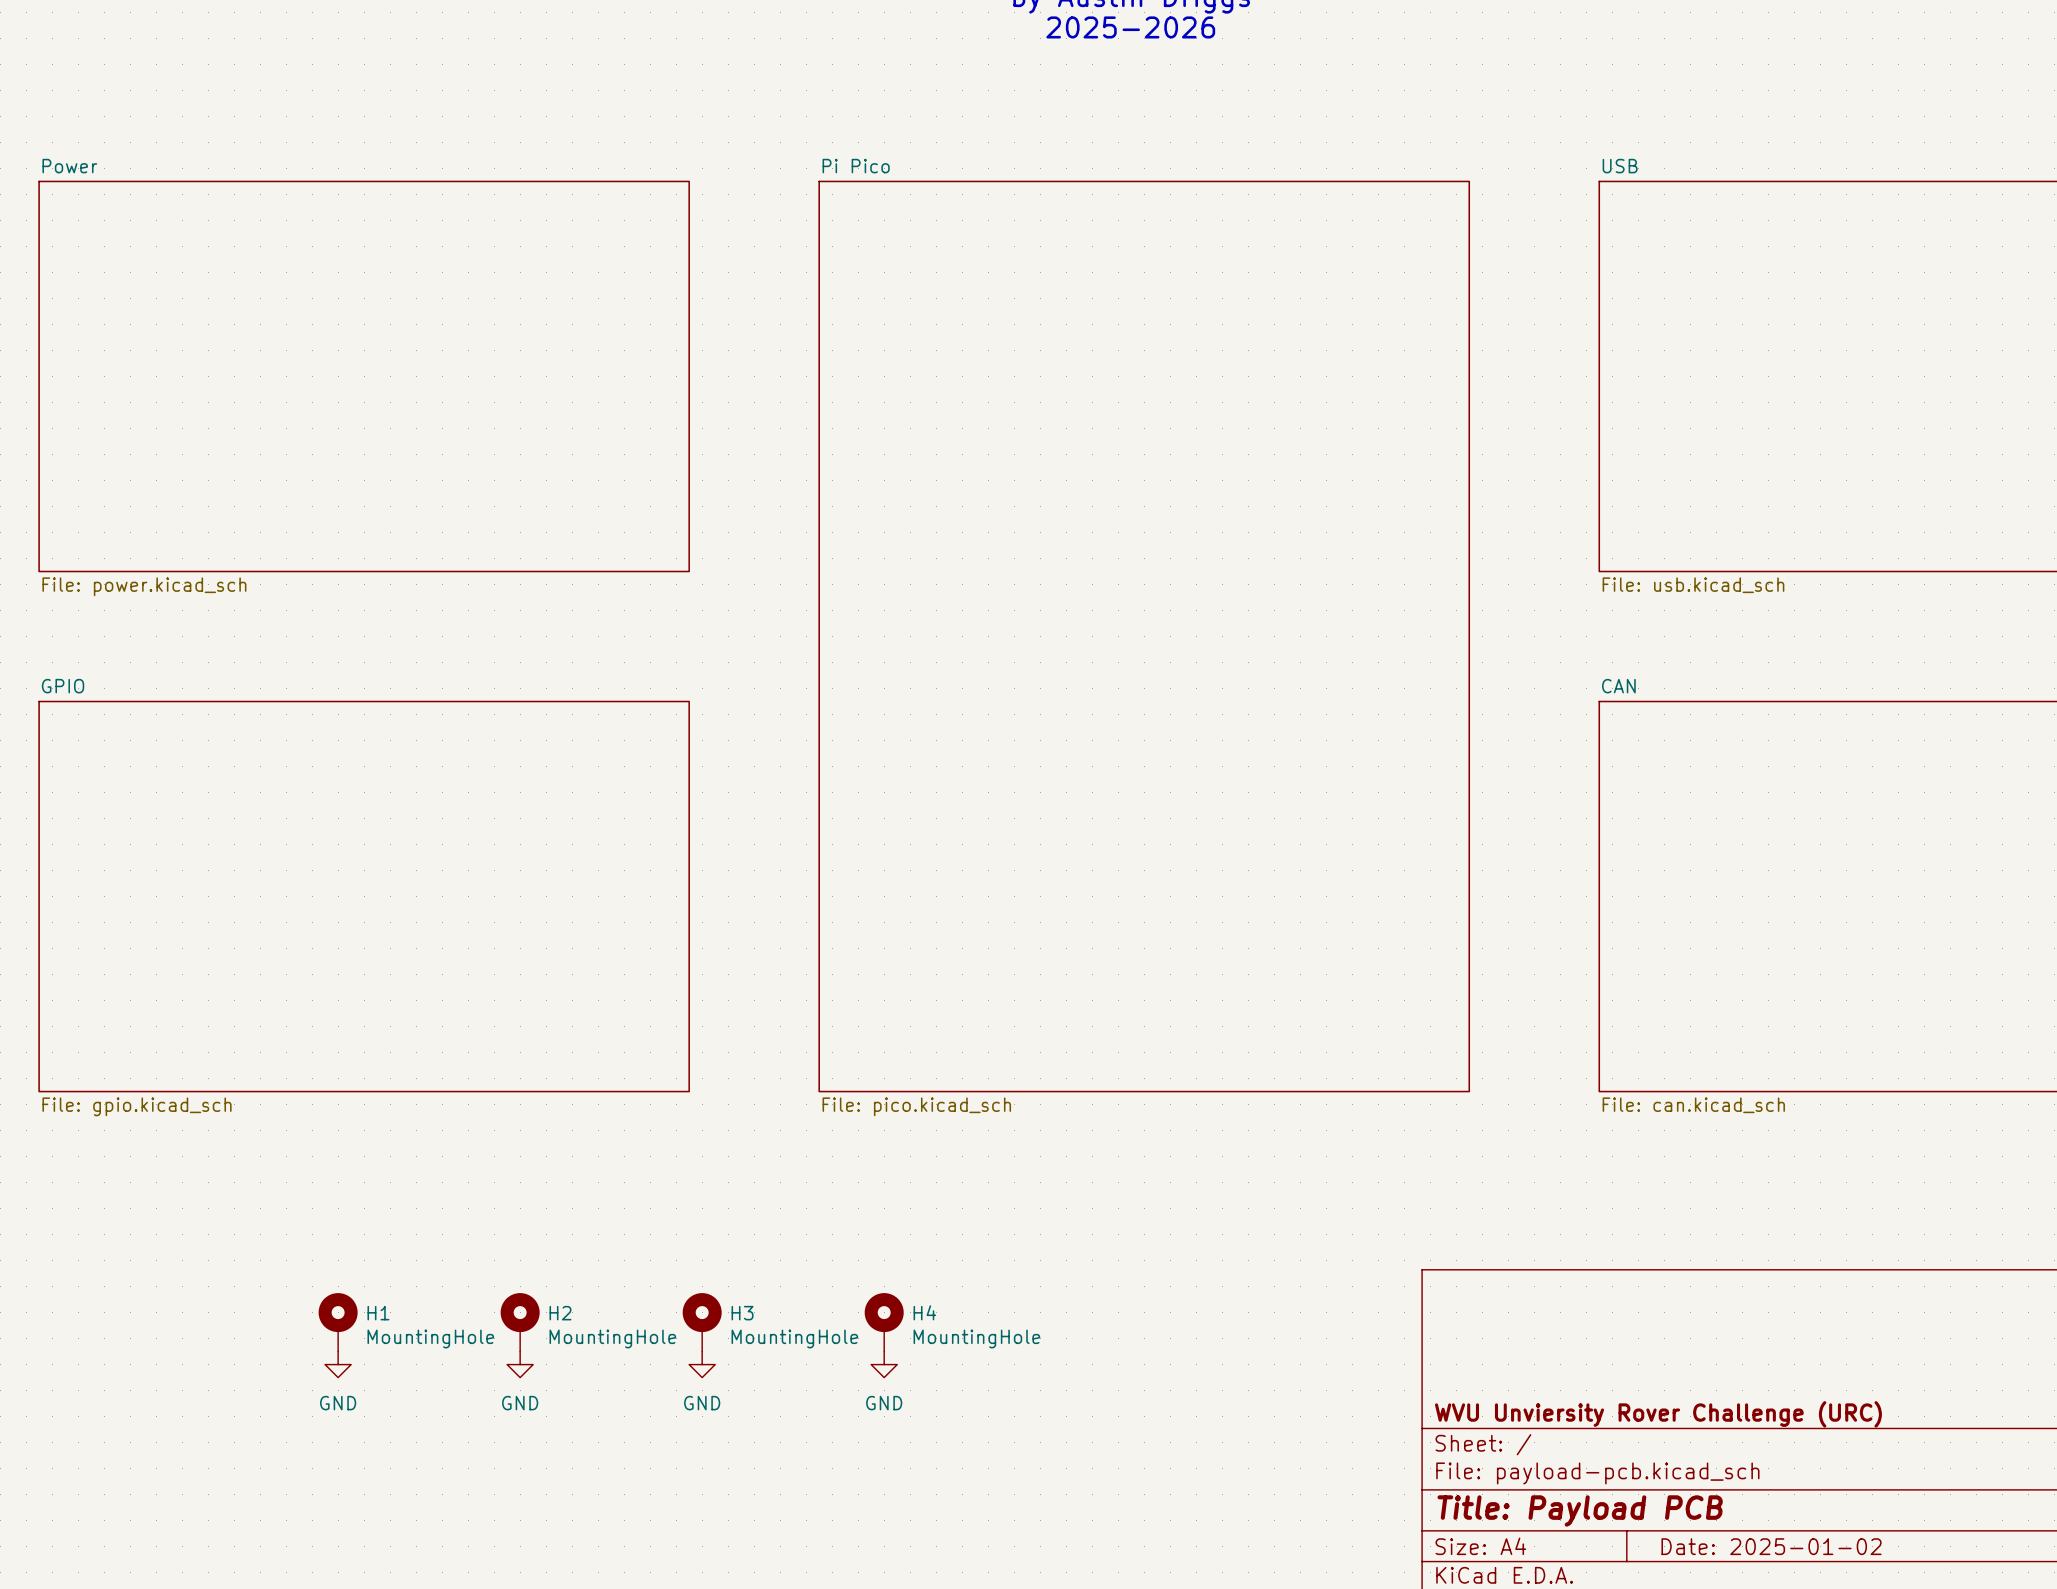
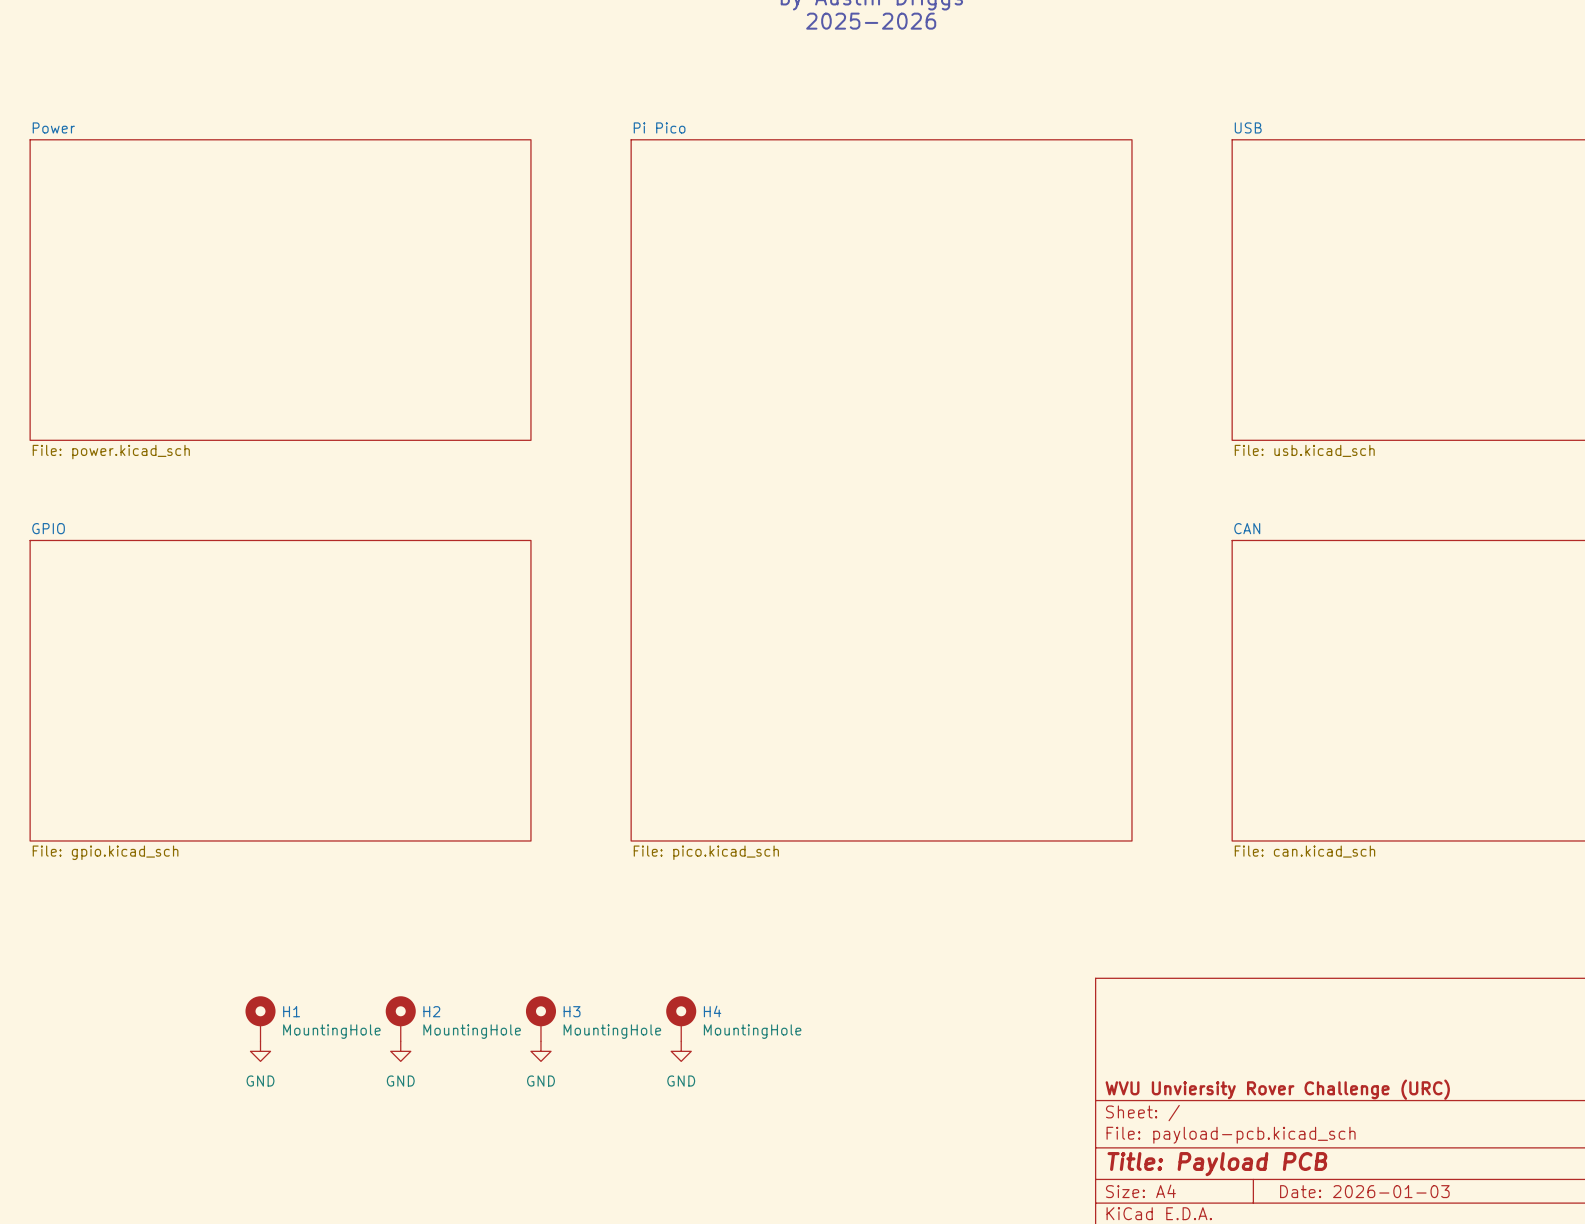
title block: Date: 2025-01-02 (1771, 1546) -> Date: 2026-01-03 (1364, 1191)

